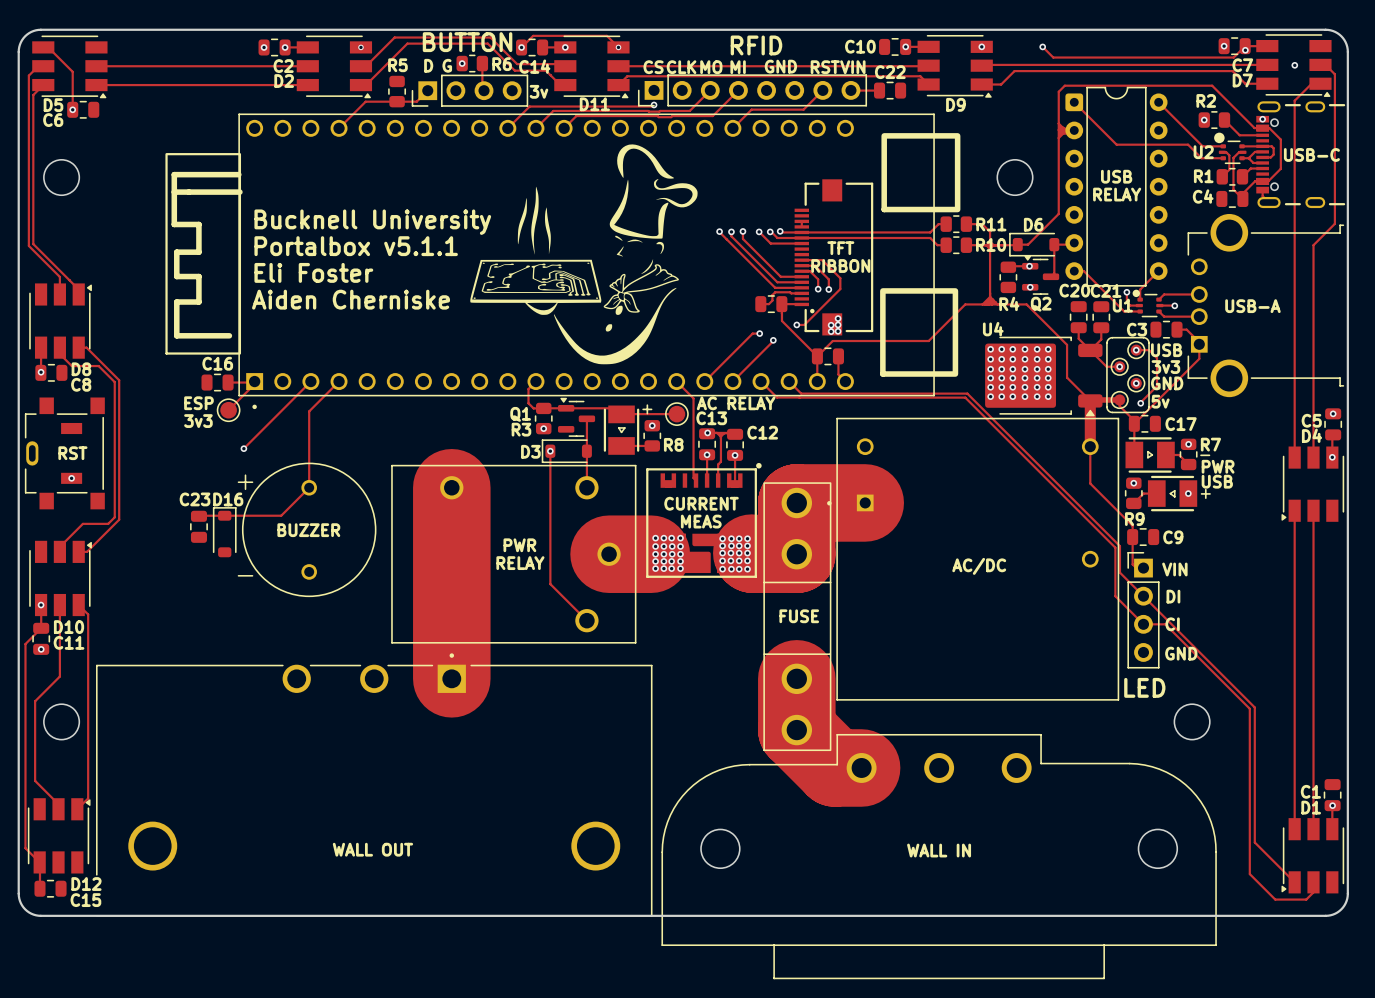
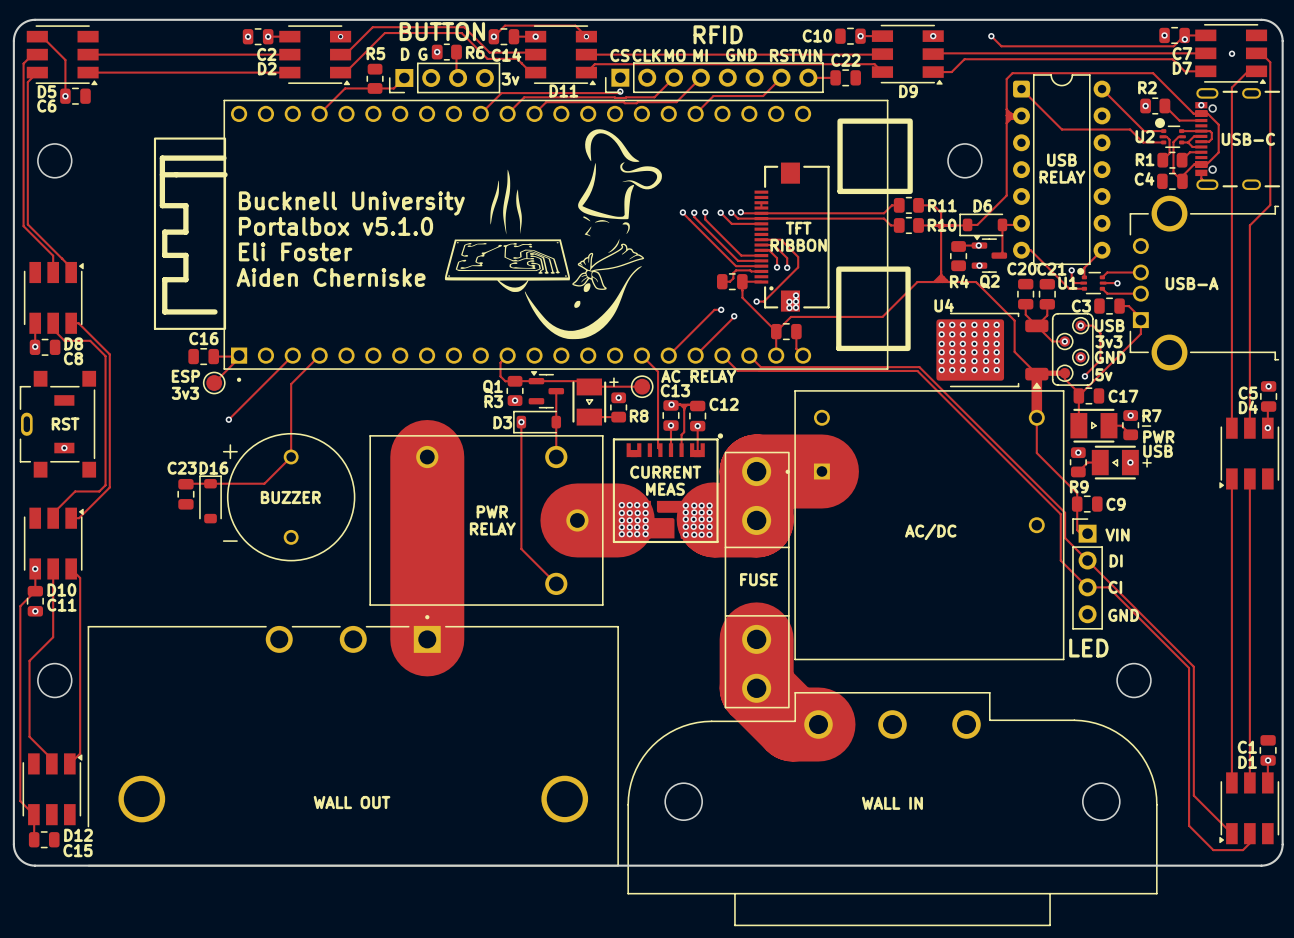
text: Portalbox v5.1.1 (356, 246) -> Portalbox v5.1.0 (335, 226)

